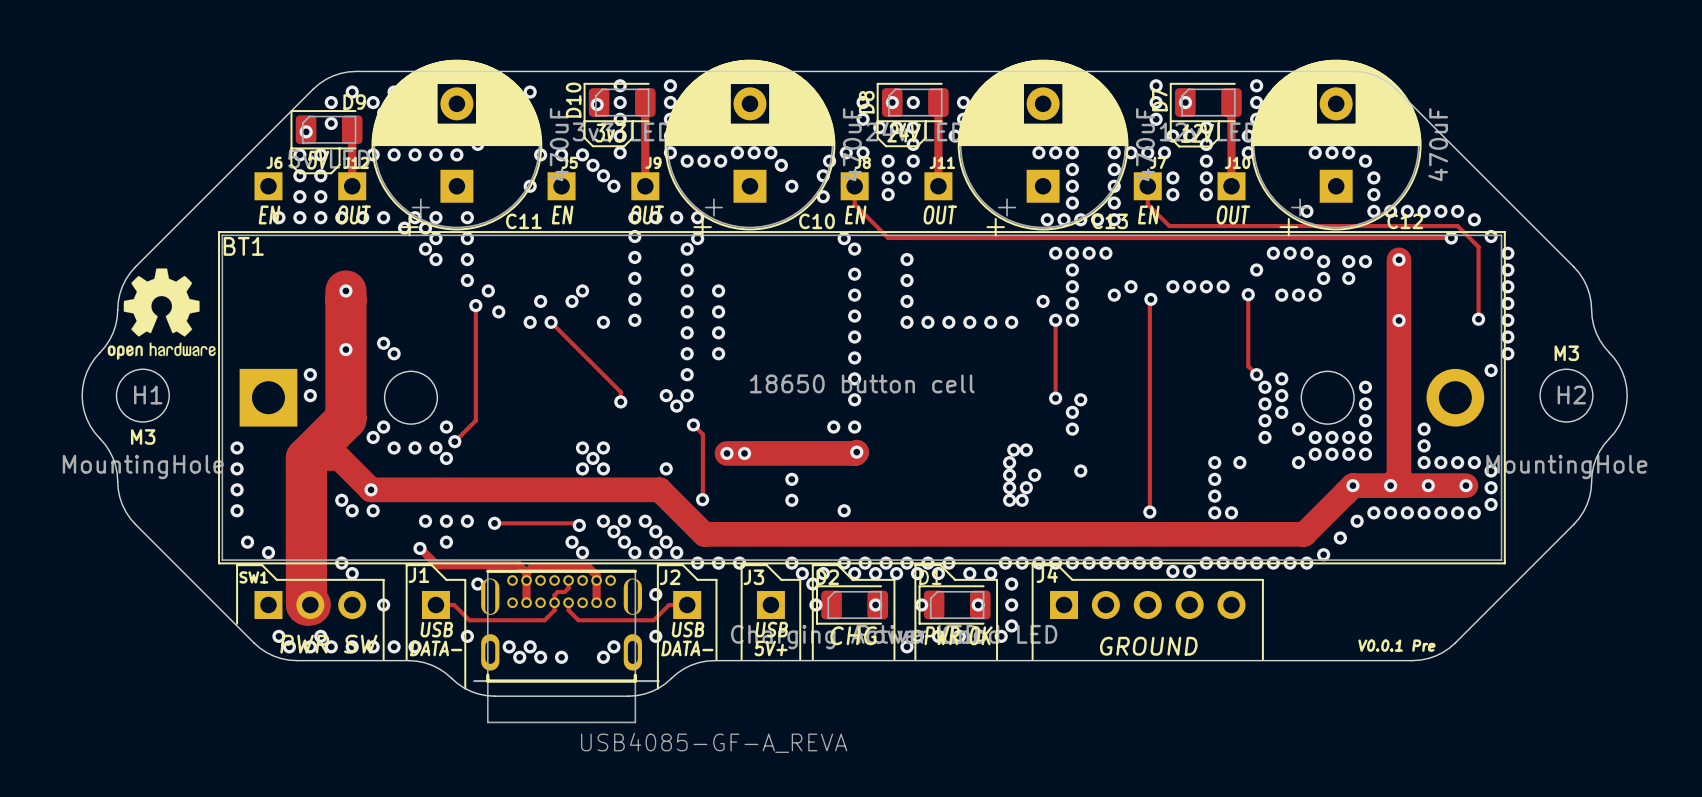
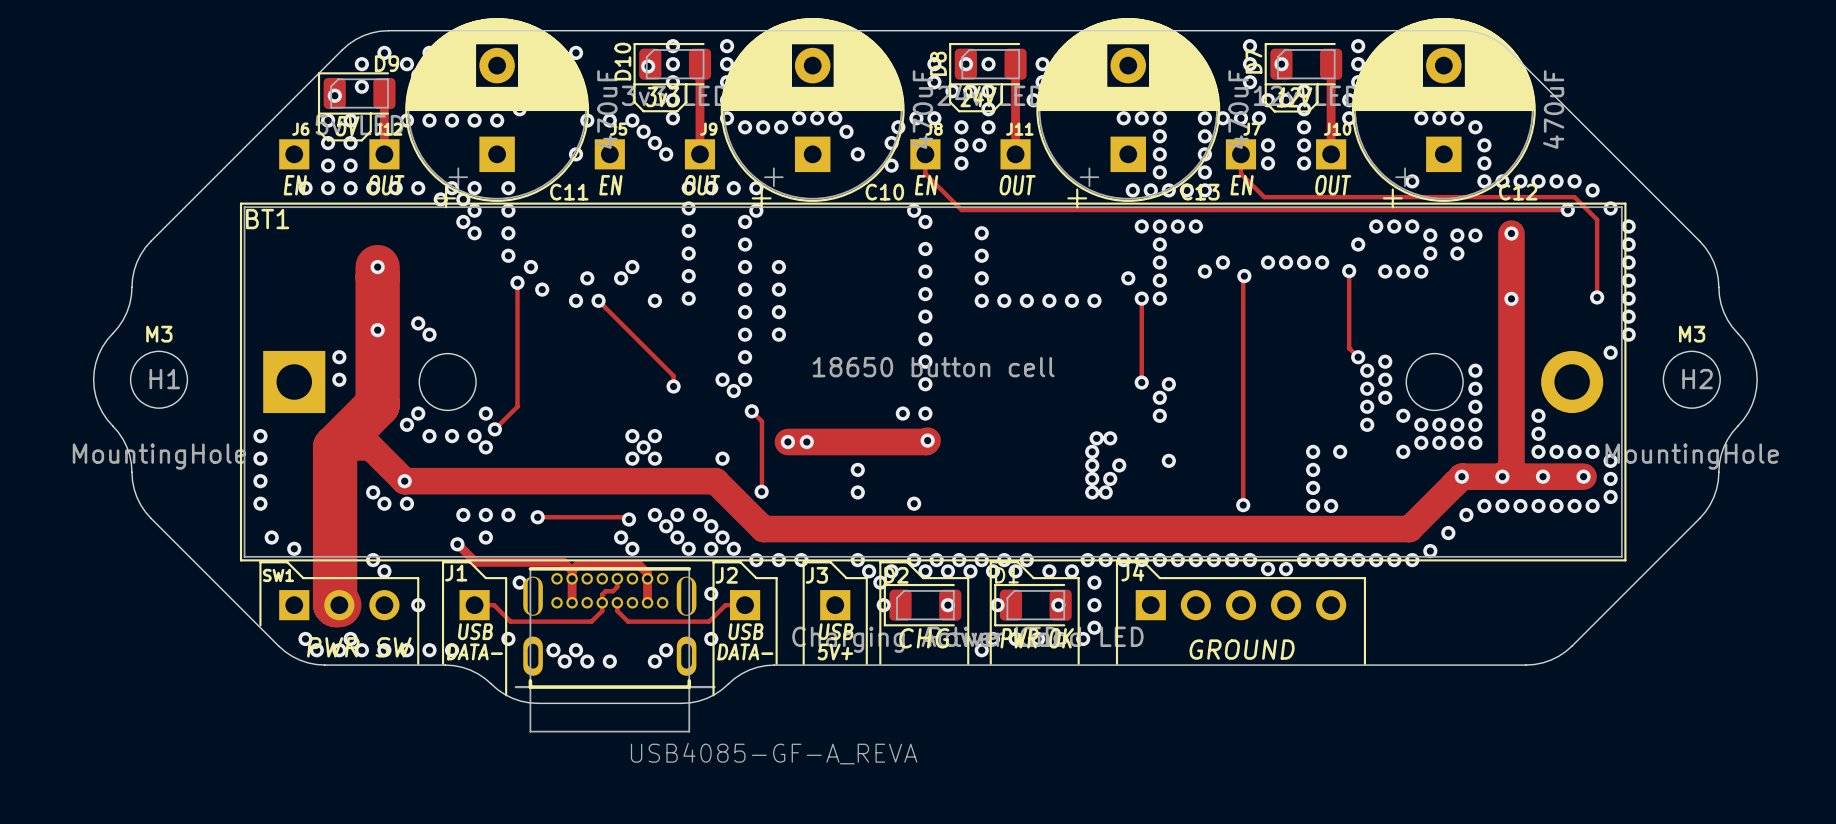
drawing: [107, 268, 216, 360] -> none
text position: M3 (143, 437) -> M3 (159, 334)
text: V0.0.1 Pre (1396, 645) -> none

